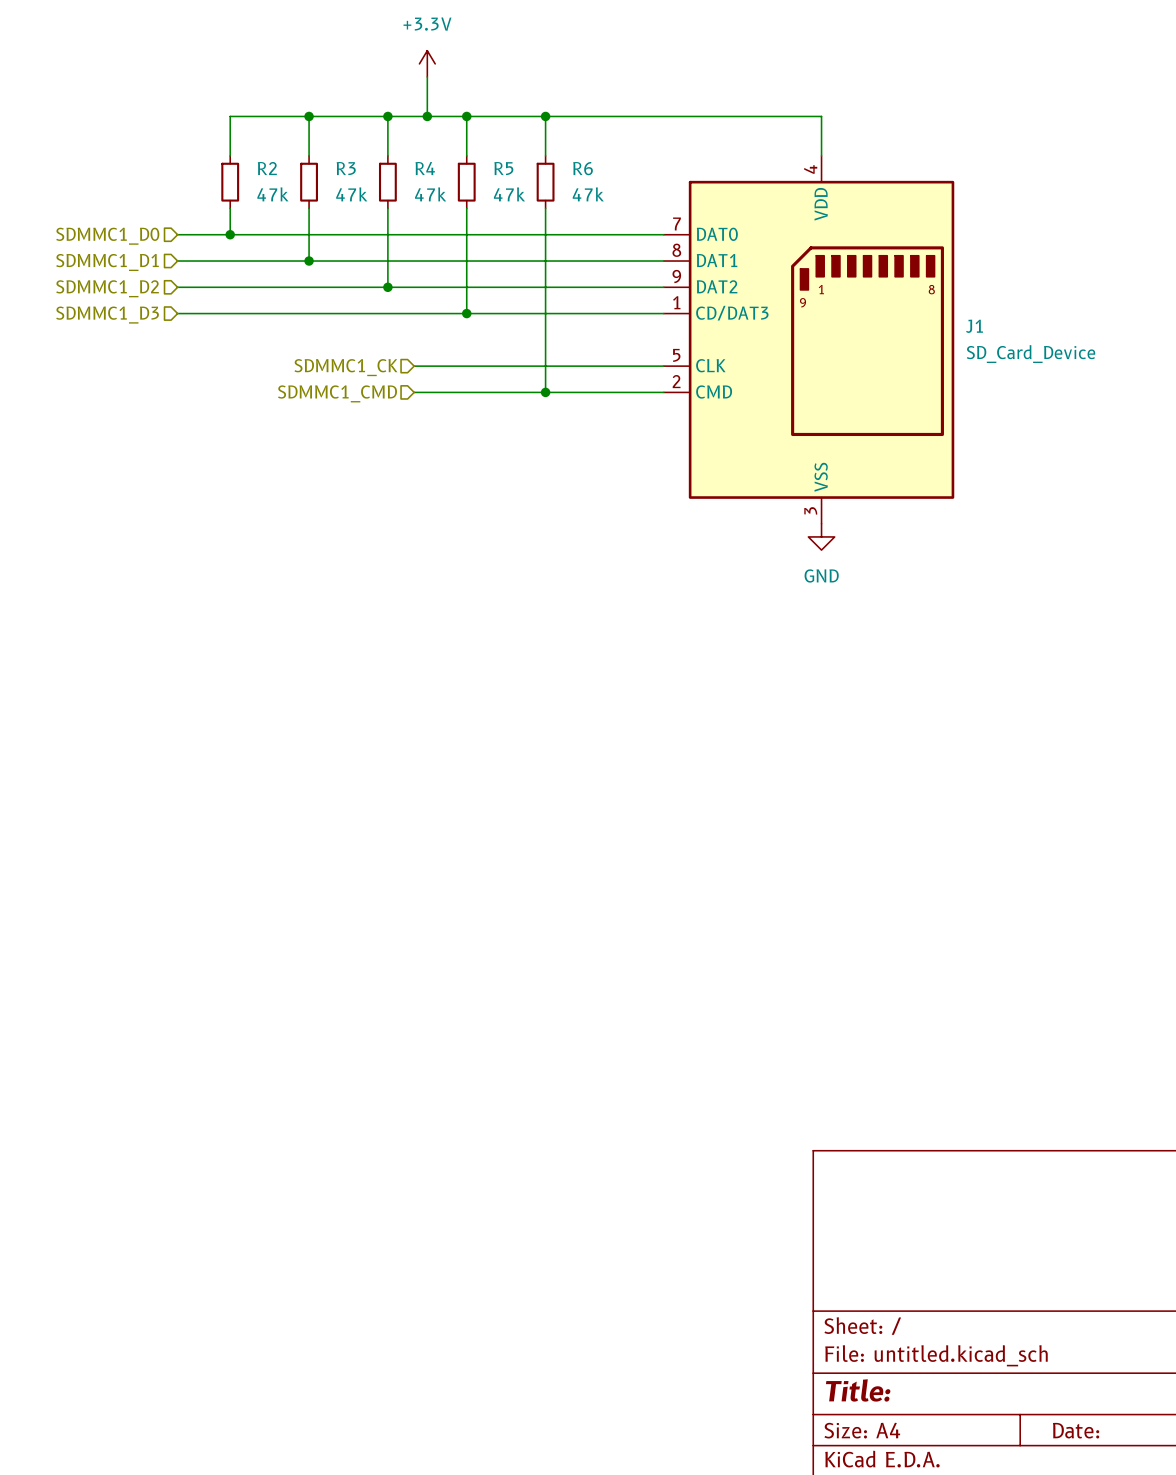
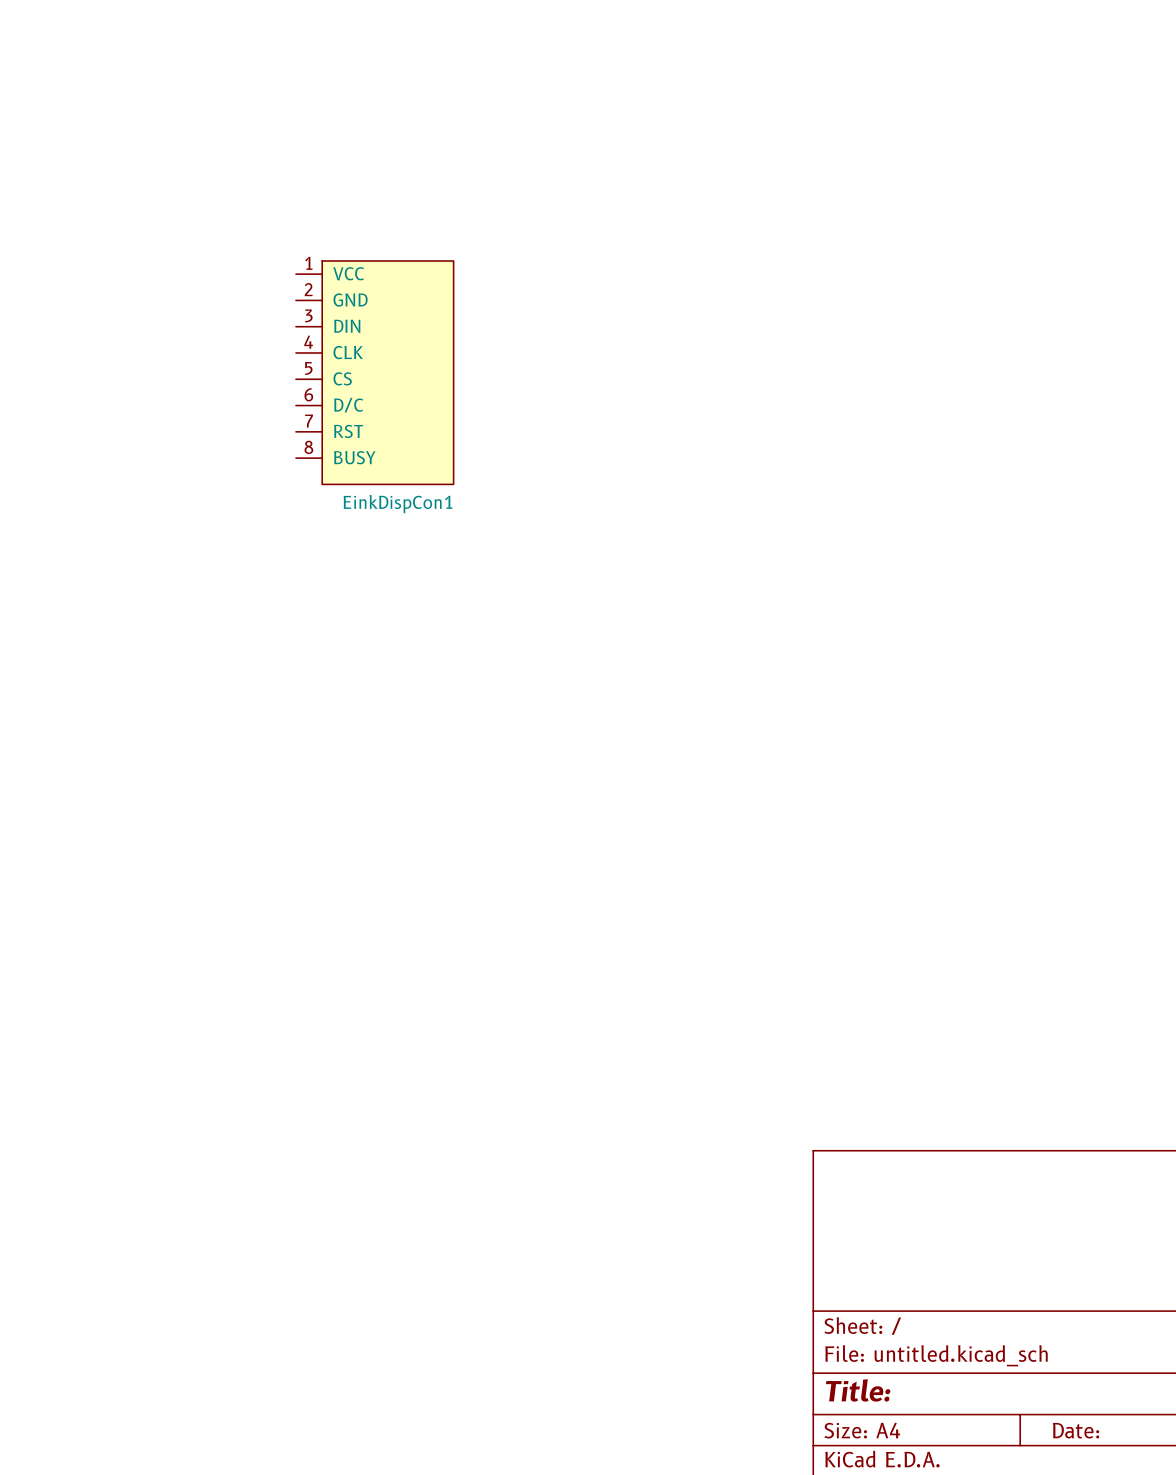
power symbol: +3.3V (427, 63) -> none
wire: (427, 77) (427, 116) -> none
wire: (309, 116) (309, 155) -> none
junction: (309, 116) -> none
wire: (387, 116) (387, 155) -> none
junction: (387, 116) -> none
junction: (427, 116) -> none
wire: (466, 116) (466, 155) -> none
junction: (466, 116) -> none
wire: (545, 116) (545, 155) -> none
junction: (545, 116) -> none
wire: (230, 155) (230, 116) (821, 116) (821, 155) -> none
R2: 47k (230, 182) -> none
R3: 47k (309, 182) -> none
R4: 47k (387, 182) -> none
R5: 47k (466, 182) -> none
R6: 47k (545, 182) -> none
wire: (230, 208) (230, 234) -> none
wire: (309, 208) (309, 261) -> none
wire: (387, 208) (387, 287) -> none
wire: (466, 208) (466, 313) -> none
wire: (545, 208) (545, 392) -> none
wire: (177, 234) (663, 234) -> none
junction: (230, 234) -> none
hierarchical label: SDMMC1_D0 (107, 236) -> none
wire: (177, 261) (663, 261) -> none
junction: (309, 261) -> none
hierarchical label: SDMMC1_D1 (107, 262) -> none
wire: (177, 287) (663, 287) -> none
junction: (387, 287) -> none
hierarchical label: SDMMC1_D2 (107, 288) -> none
wire: (177, 313) (663, 313) -> none
junction: (466, 313) -> none
hierarchical label: SDMMC1_D3 (107, 315) -> none
J1: SD_Card_Device (809, 339) -> none
wire: (414, 366) (663, 366) -> none
hierarchical label: SDMMC1_CK (345, 367) -> none
EinkDispCon1: none -> (374, 372)
wire: (414, 392) (663, 392) -> none
junction: (545, 392) -> none
hierarchical label: SDMMC1_CMD (337, 393) -> none
power symbol: GND (821, 536) -> none

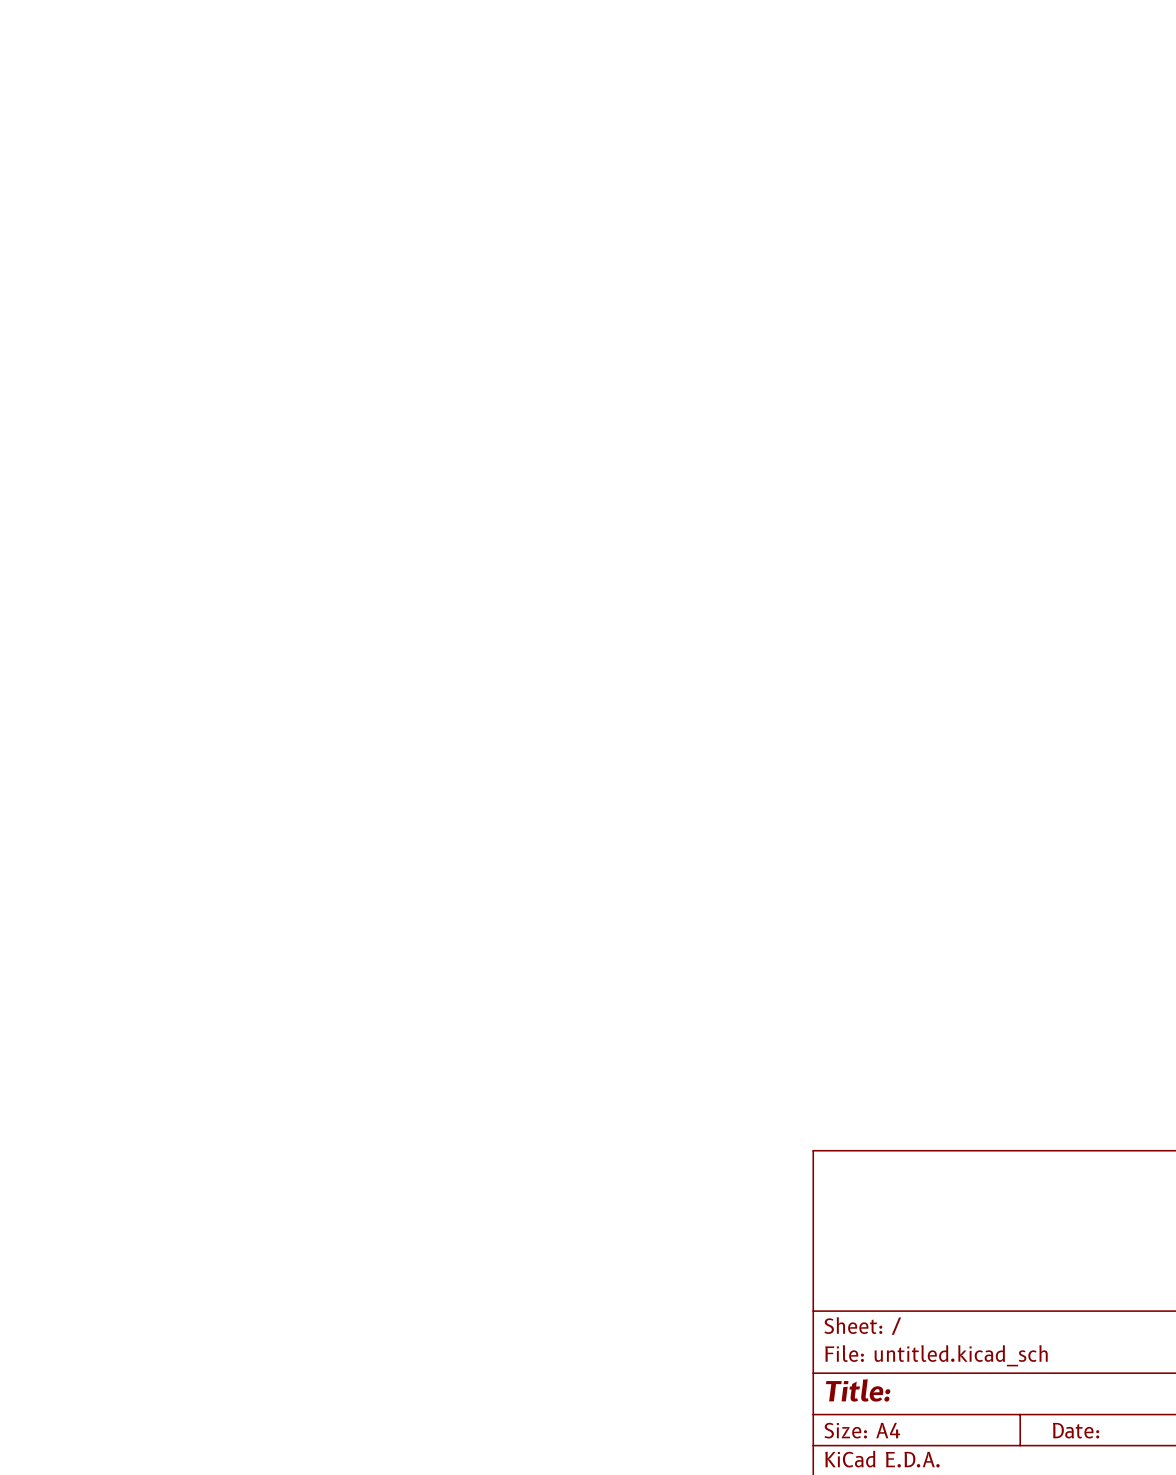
EinkDispCon1: (374, 372) -> none

